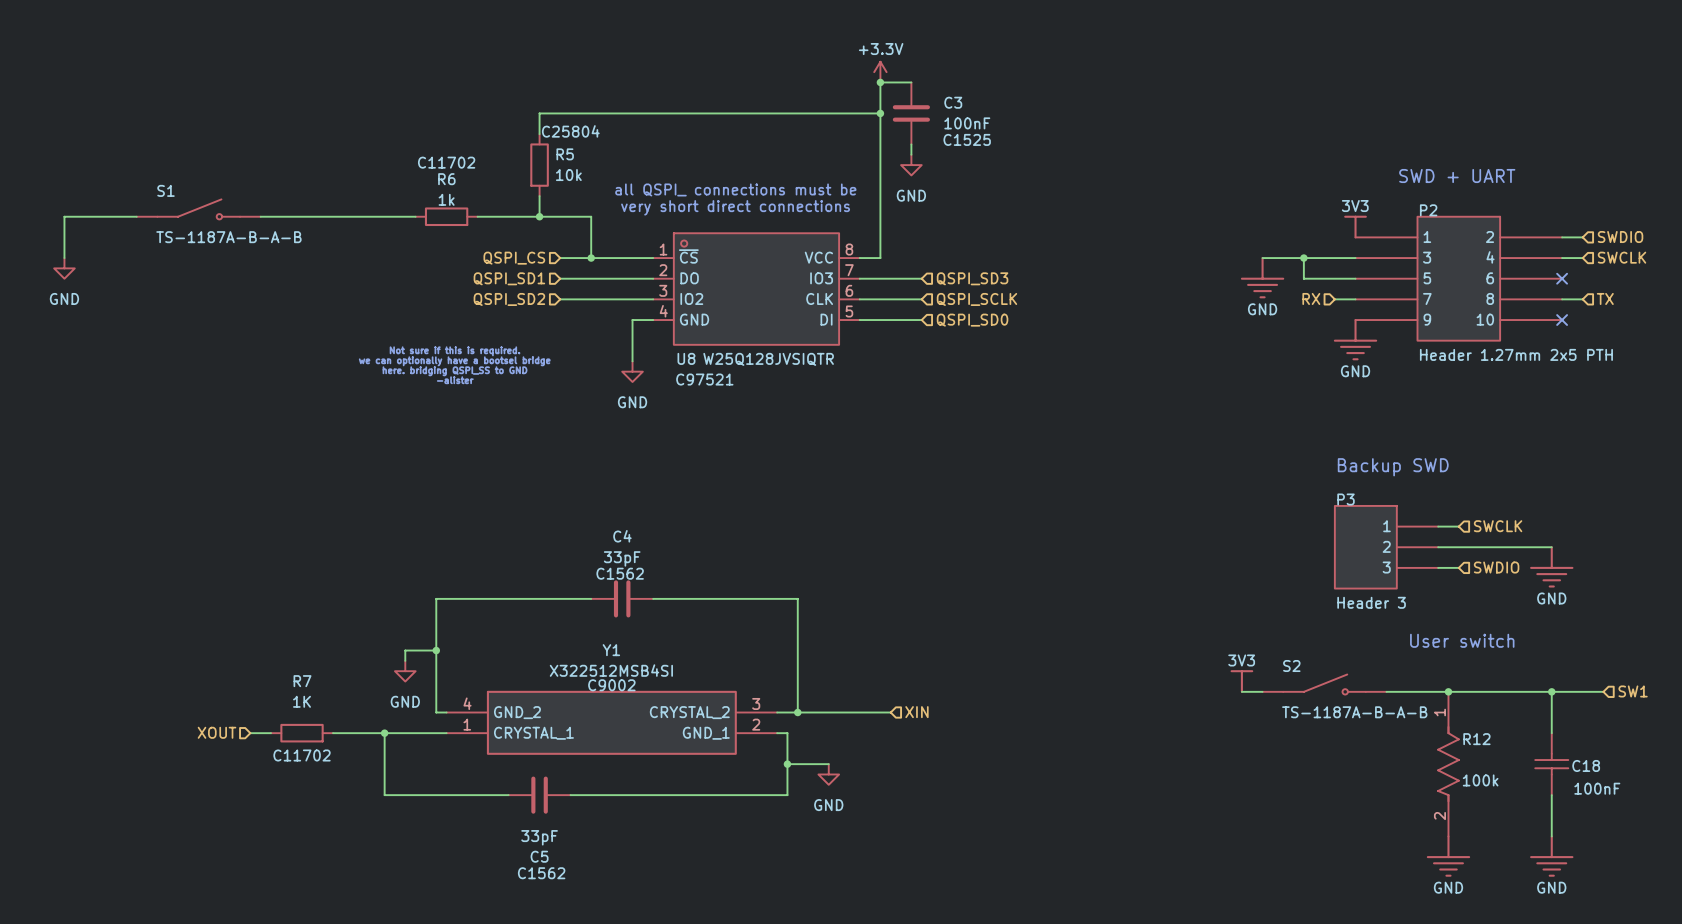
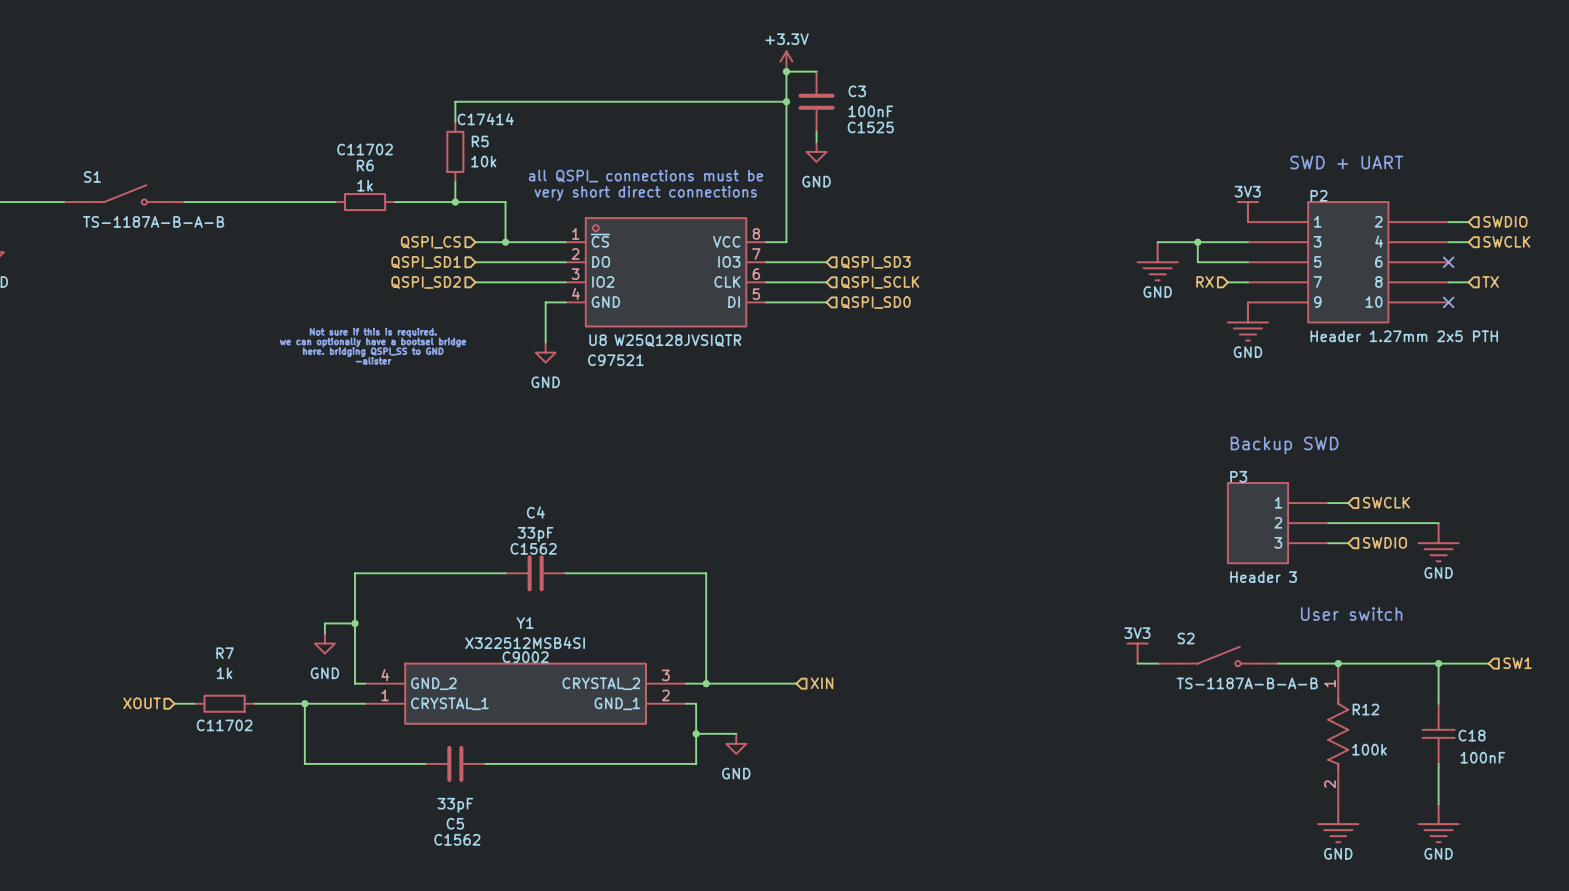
R5 text: C25804 (570, 131) -> C17414 (485, 119)
R7 value: 1K (302, 701) -> 1k (224, 673)

